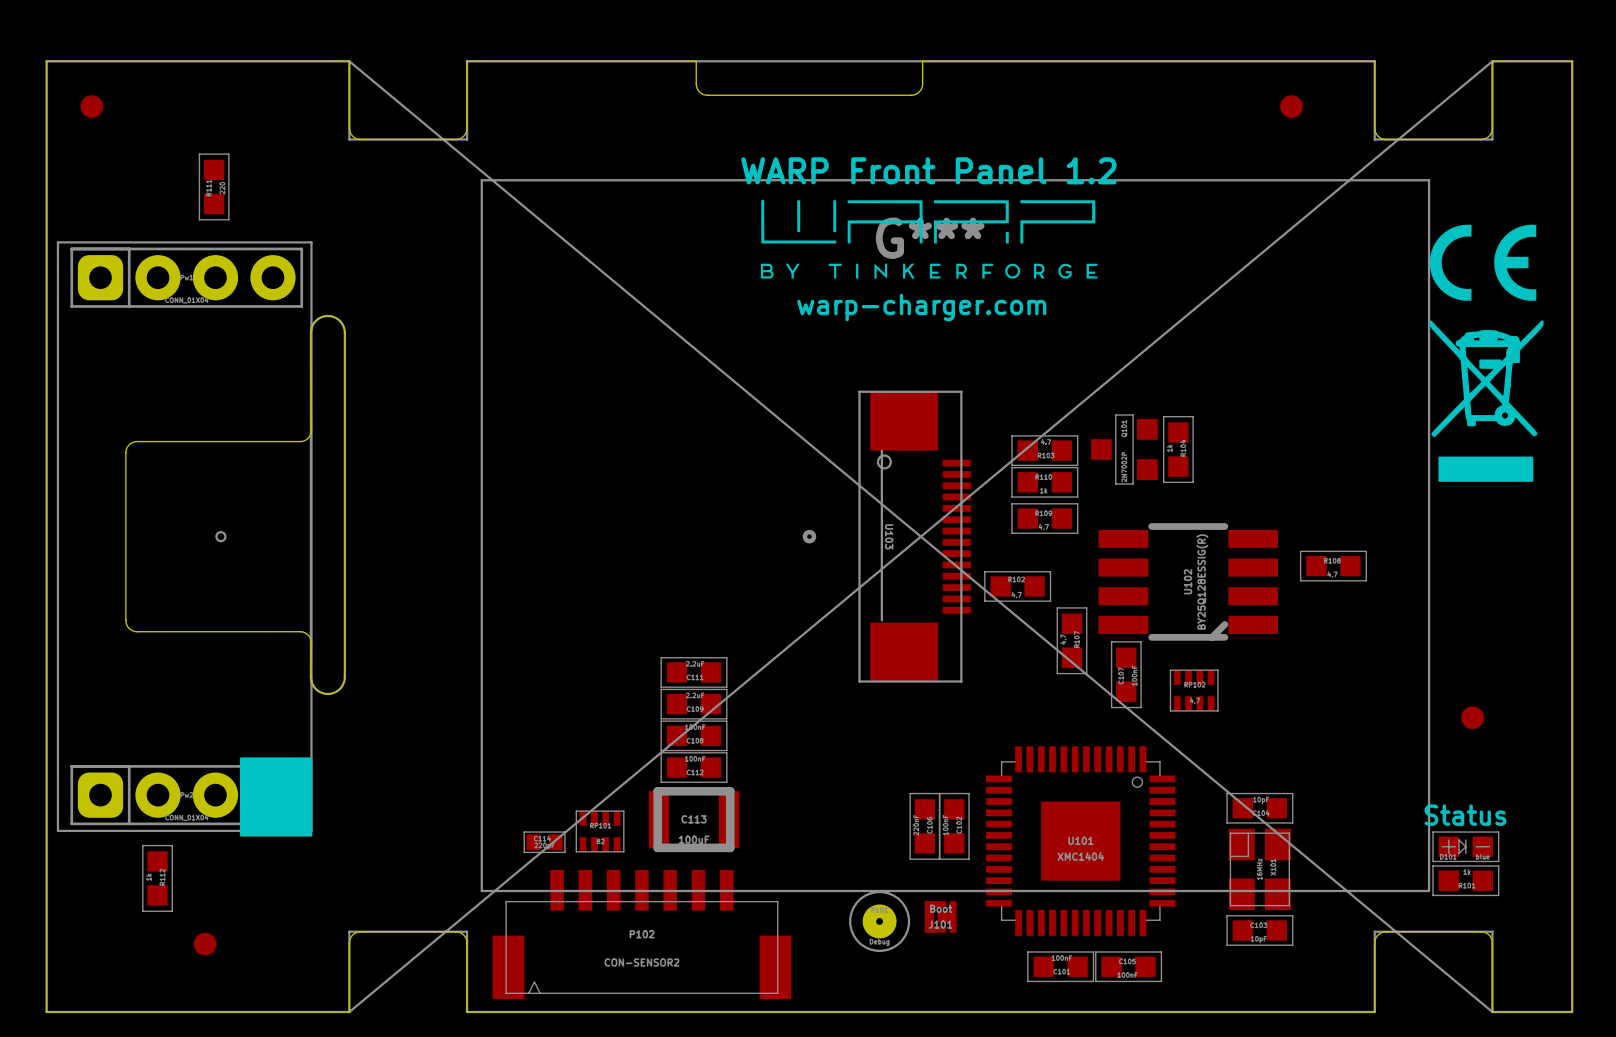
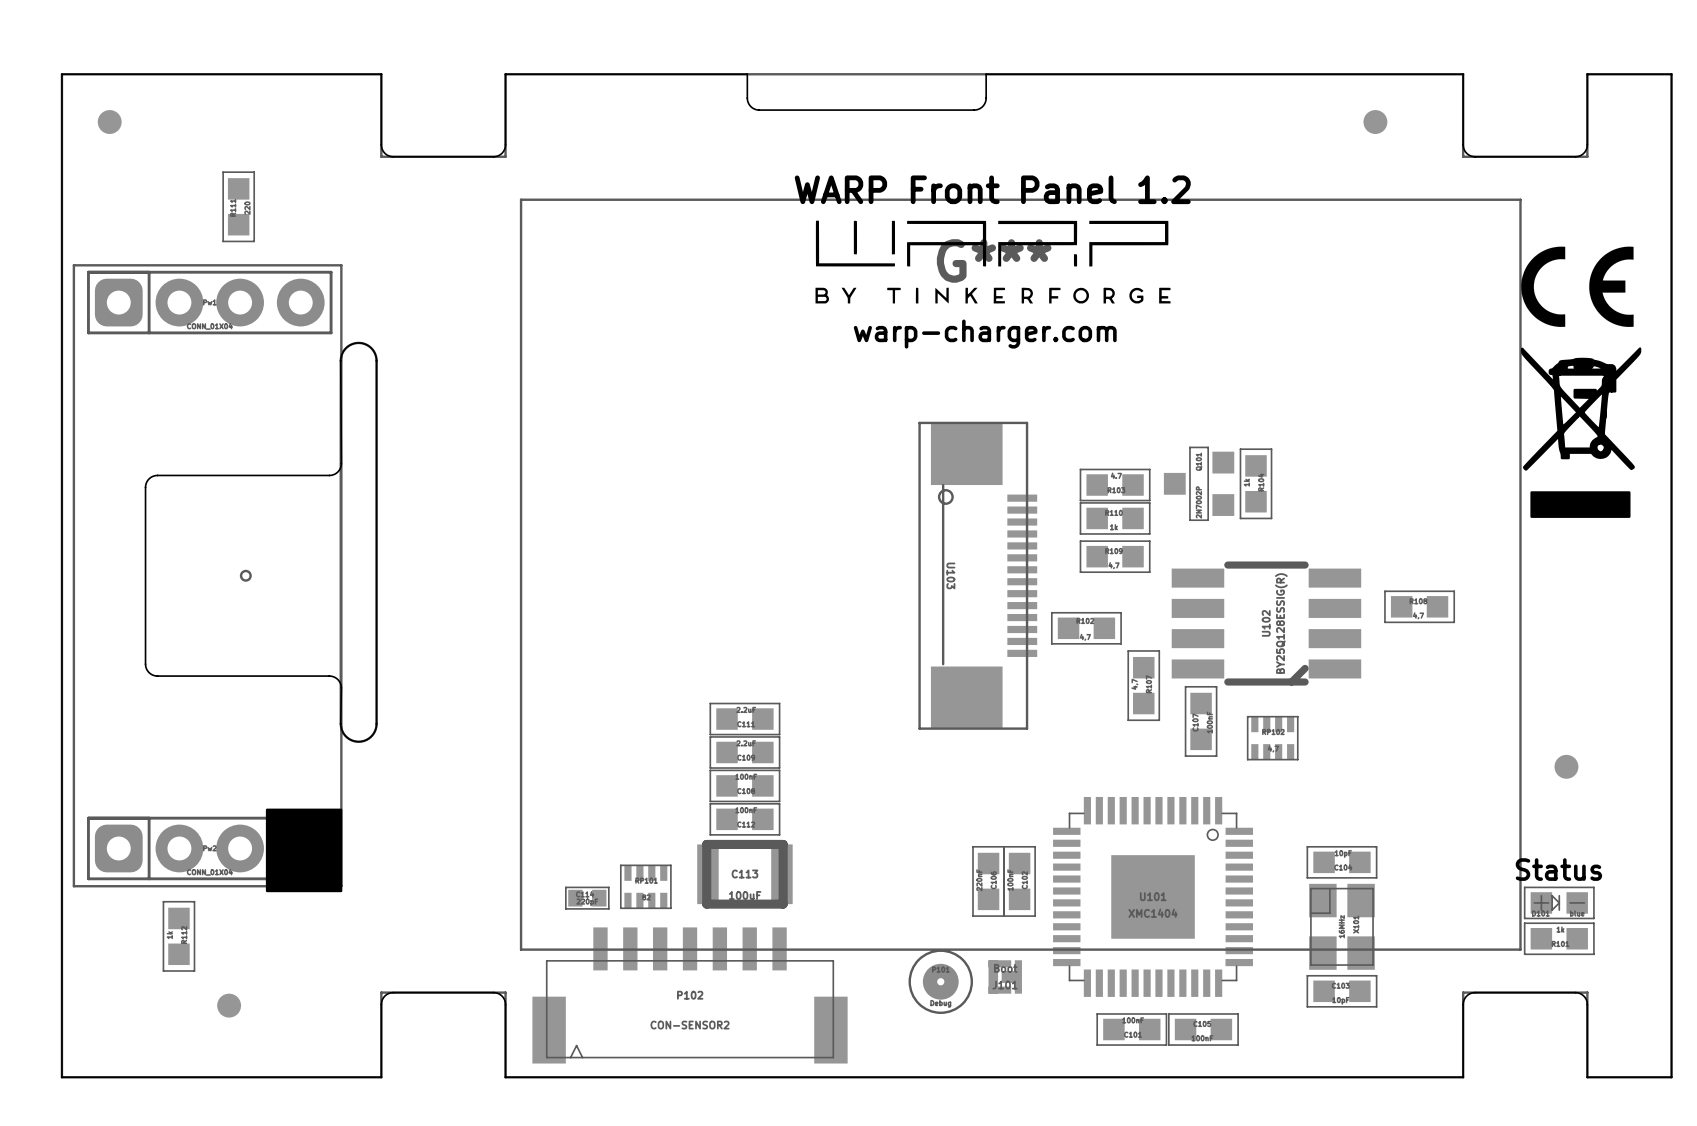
line: (349, 61) (1492, 1011) -> none
line: (1492, 61) (349, 1011) -> none
drawing: [802, 529, 817, 544] -> none

